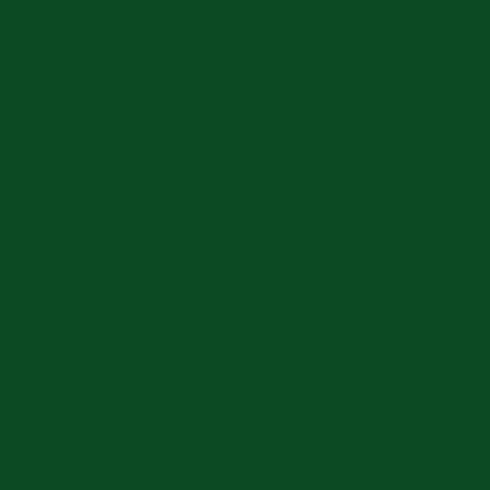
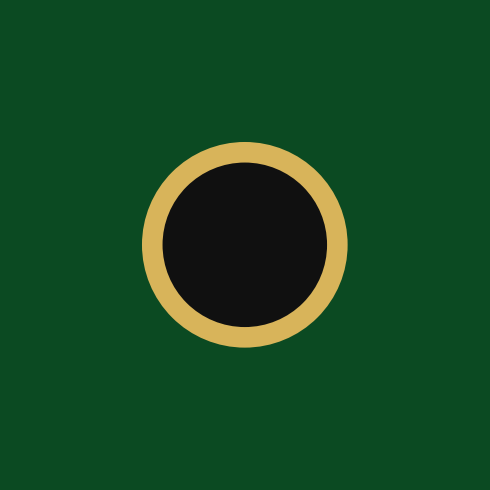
part: none -> (244, 244)

